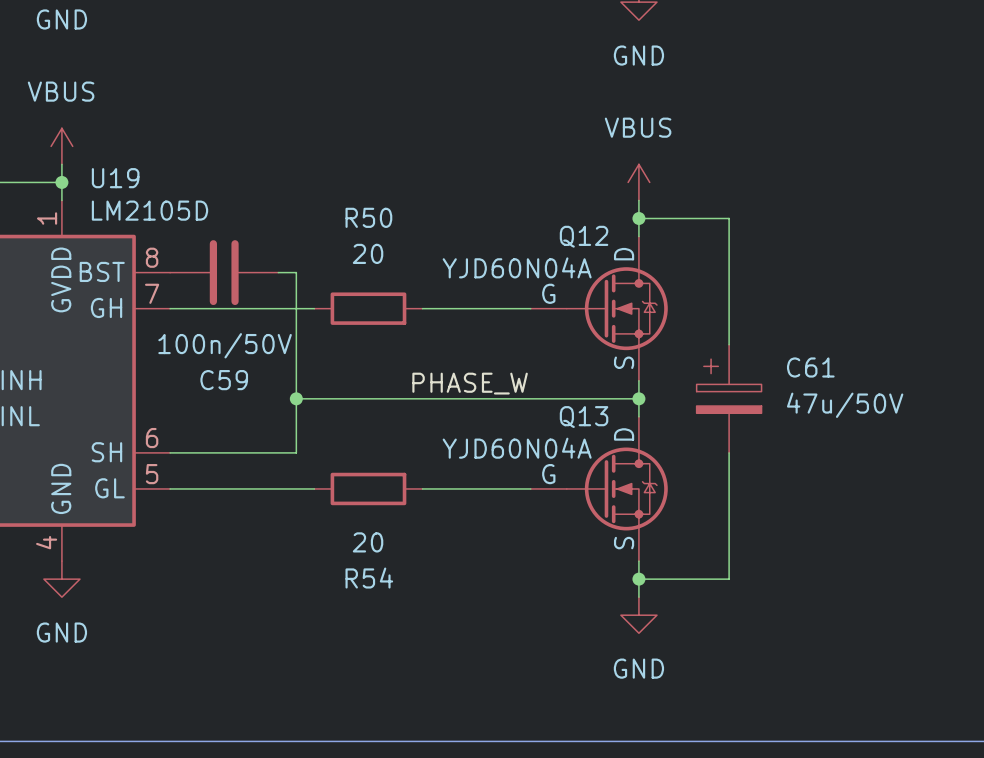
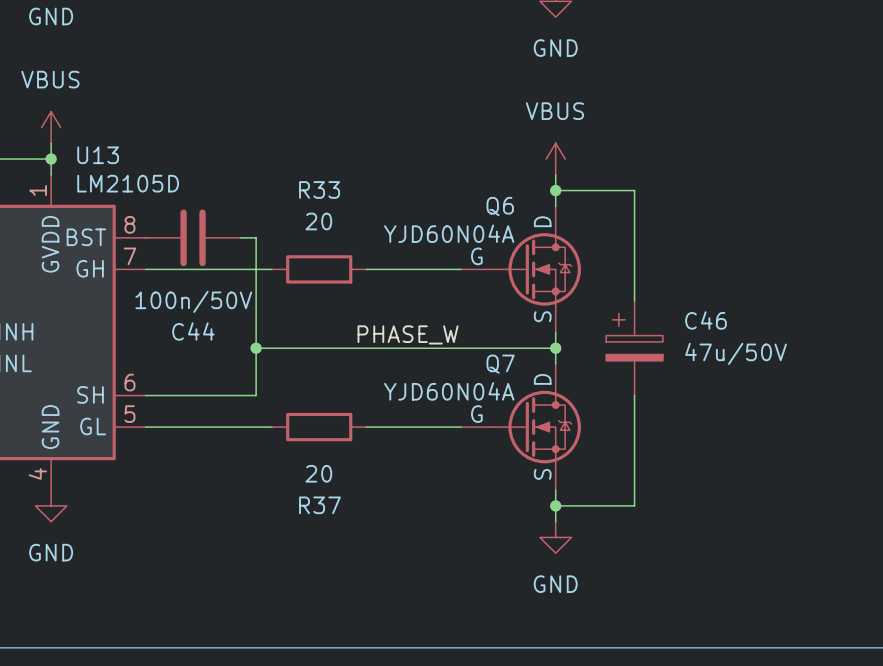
U19 name: U19 (115, 178) -> U13 (98, 155)
R50 name: R50 (368, 217) -> R33 (319, 189)
Q12 name: Q12 (584, 236) -> Q6 (500, 206)
C61 name: C61 (810, 367) -> C46 (706, 320)
C59 name: C59 (224, 380) -> C44 (193, 331)
Q13 name: Q13 (584, 417) -> Q7 (500, 364)
R54 name: R54 (369, 578) -> R37 (319, 505)

